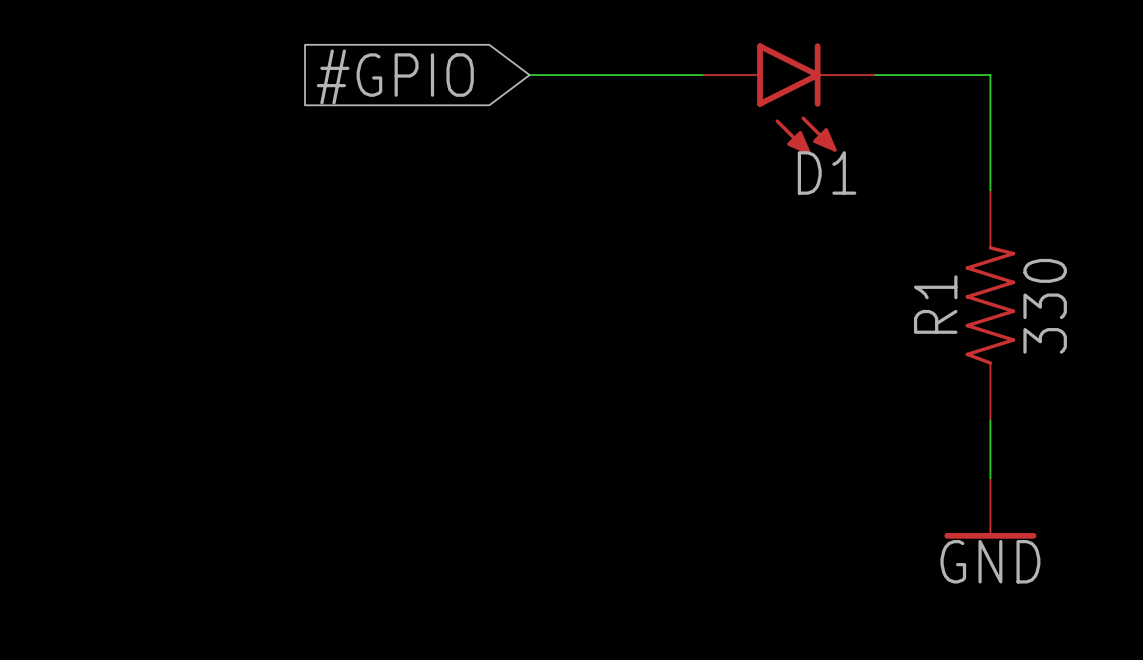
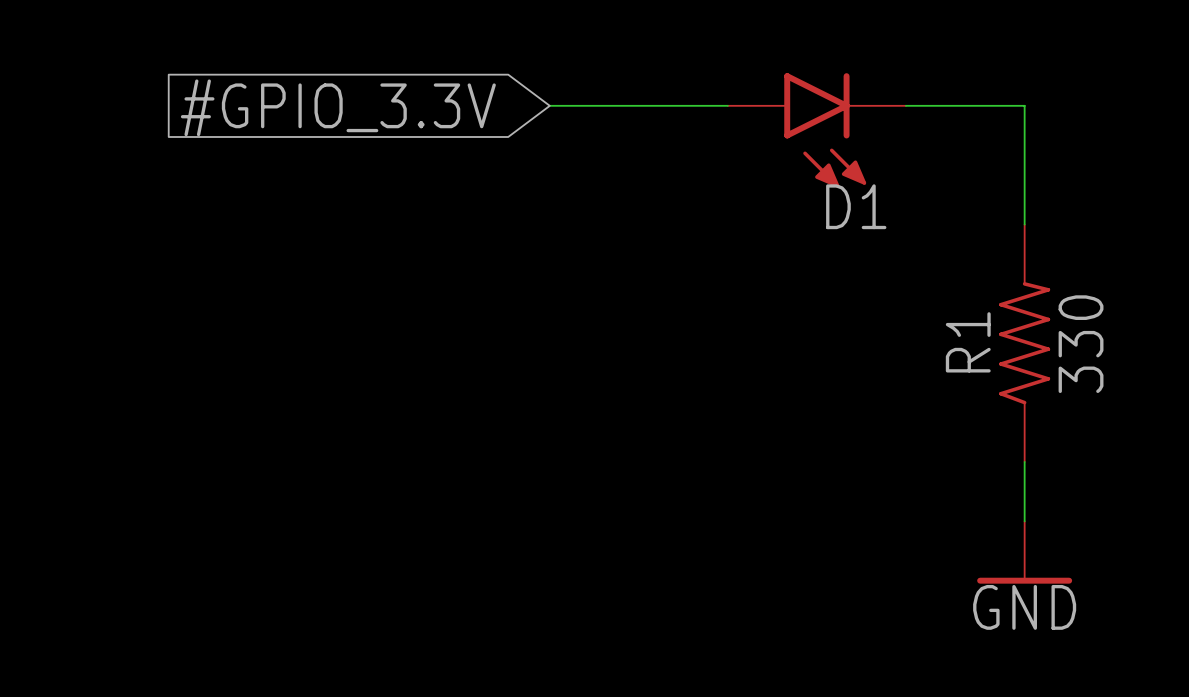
global label: #GPIO (395, 76) -> #GPIO_3.3V (338, 107)

